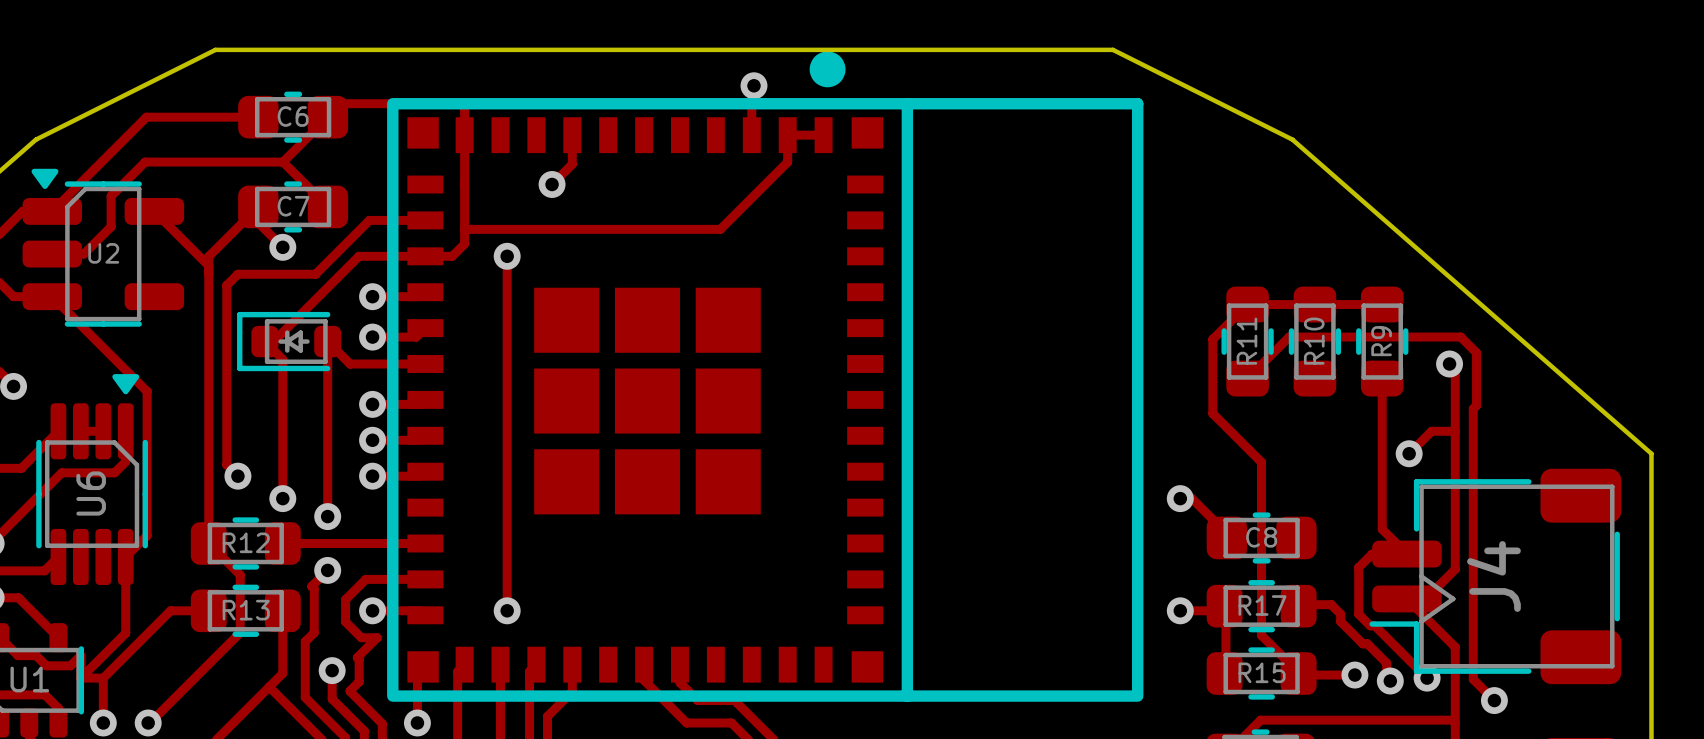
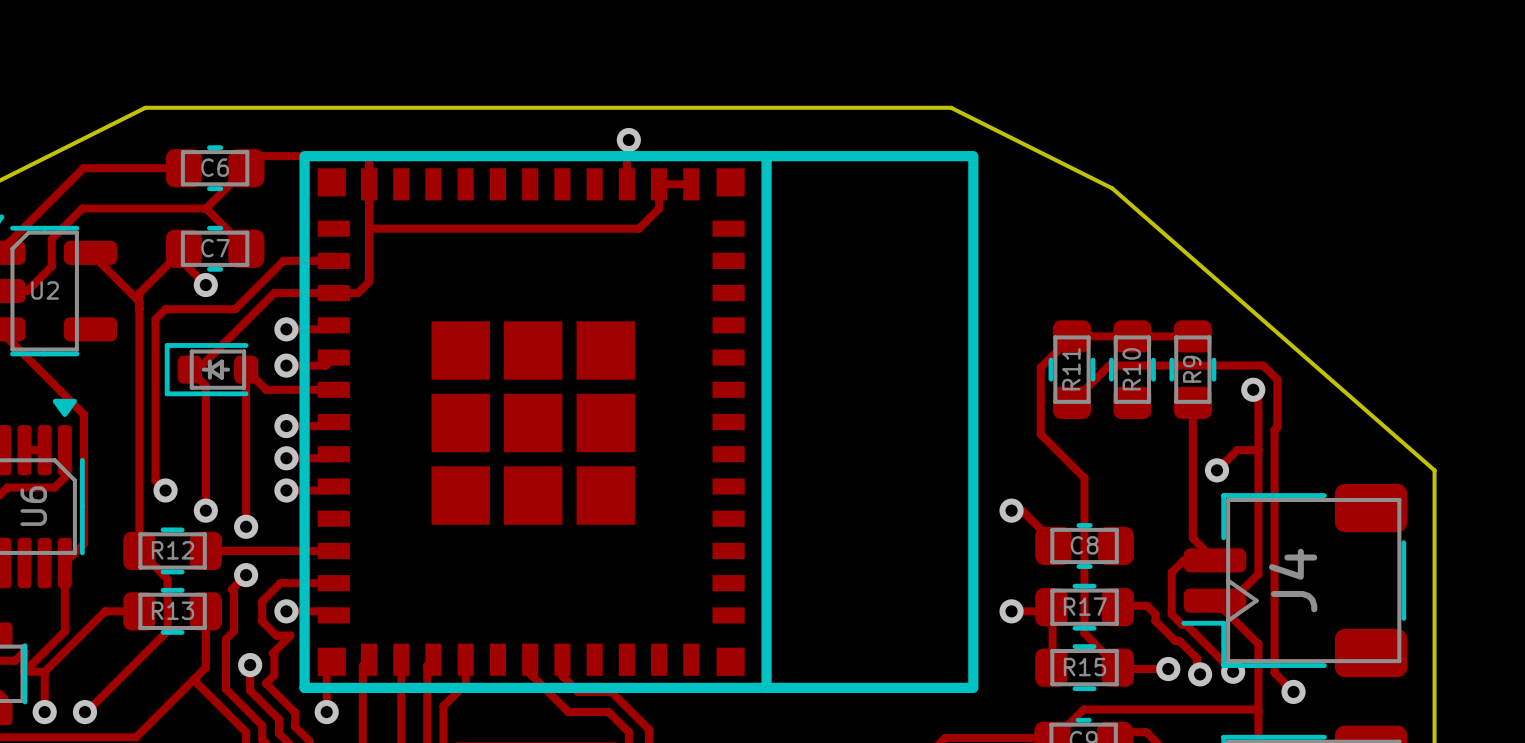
part footprint: [387, 51, 1144, 702] -> [299, 150, 979, 694]
track: (572, 135) (572, 164) (552, 184) -> none
via: (552, 184) -> none
track: (765, 184) (720, 229) (464, 229) -> (638, 228) (369, 228)
track: (507, 256) (507, 610) -> none
via: (507, 256) -> none
via: (507, 610) -> none

